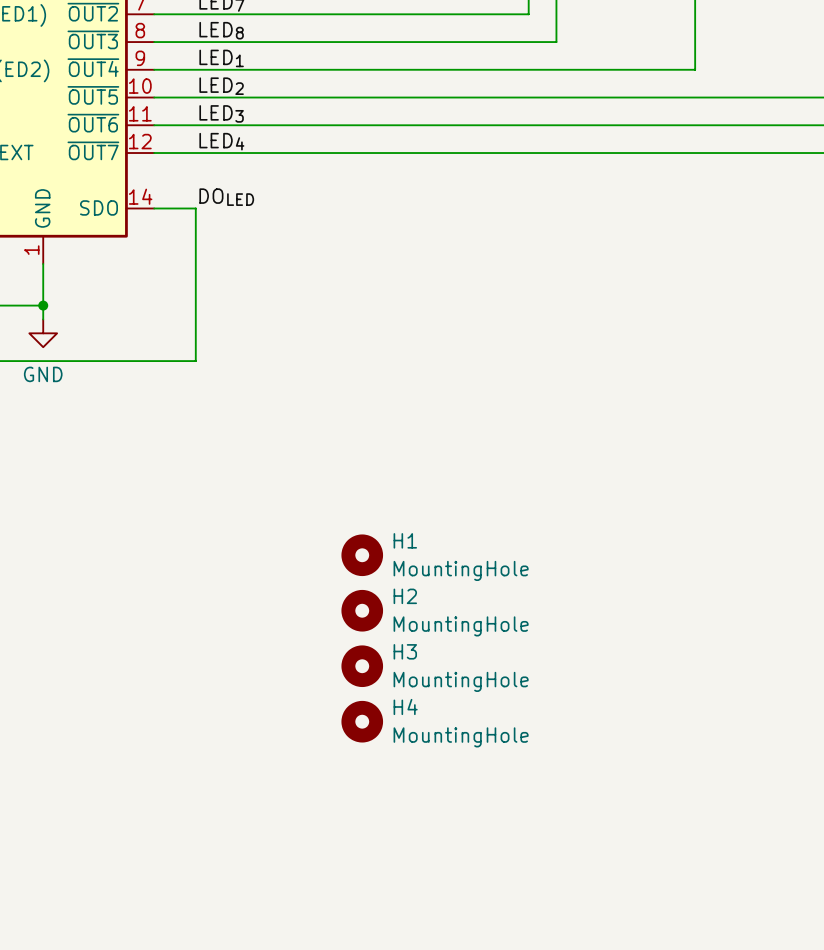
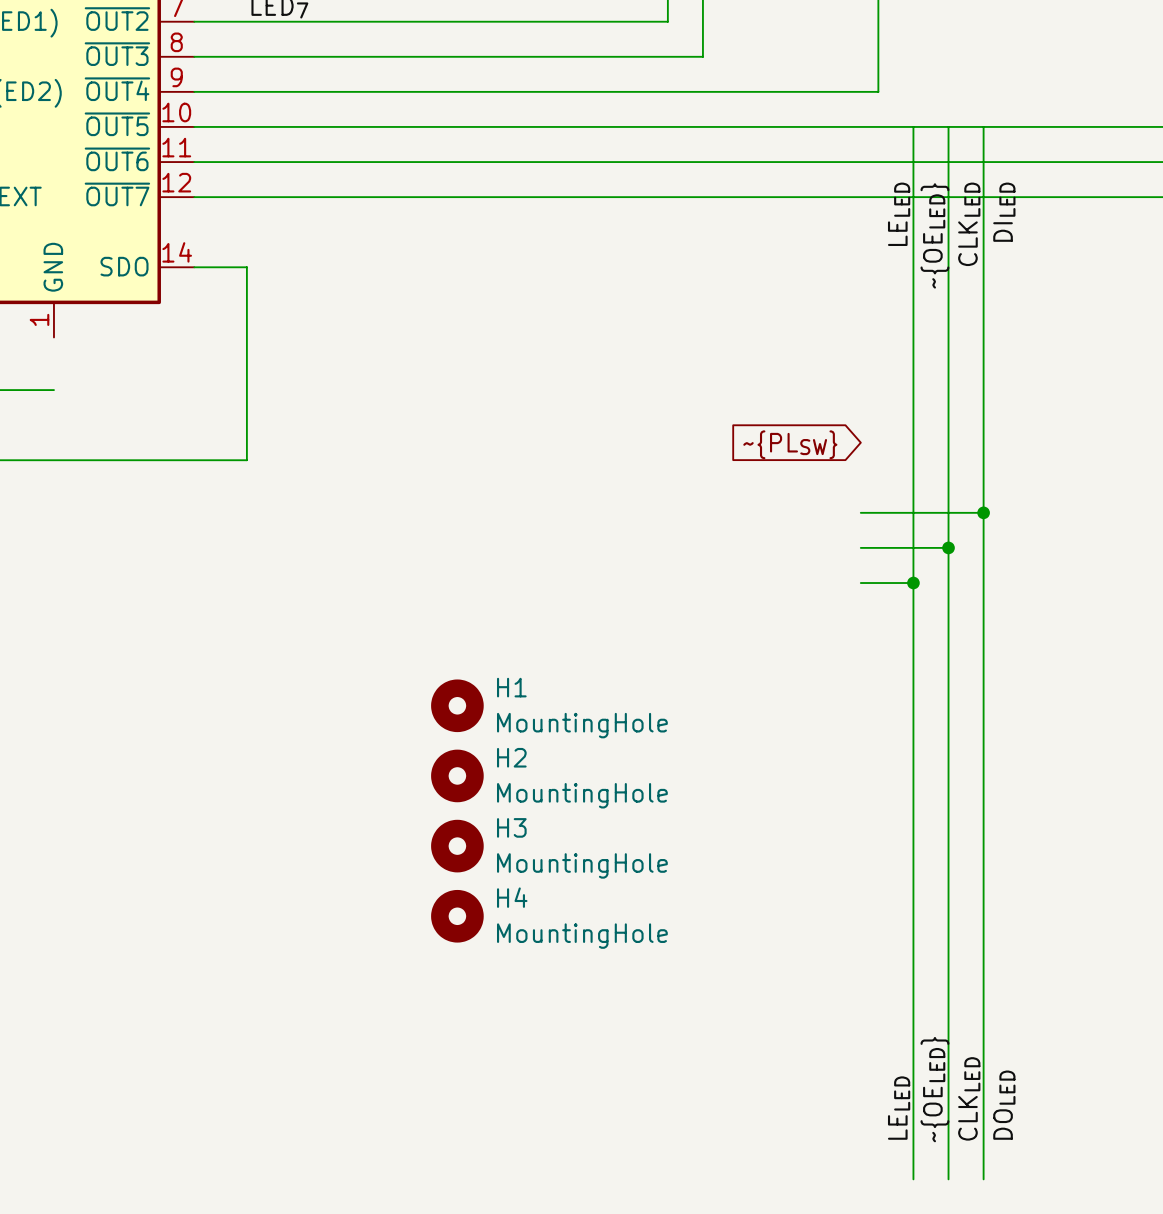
label: LED8 (221, 30) -> none
label: LED1 (221, 58) -> none
label: LED2 (221, 86) -> none
wire: none -> (913, 126) (913, 1179)
wire: none -> (948, 126) (948, 1179)
wire: none -> (983, 126) (983, 1179)
label: LED3 (221, 113) -> none
label: LED4 (221, 141) -> none
label: none -> DILED (1004, 212)
label: none -> LELED (899, 214)
label: none -> CLKLED (969, 224)
label: none -> ~{OELED} (934, 235)
label: DOLED (226, 197) -> none
wire: (43, 263) (43, 319) -> none
junction: (43, 305) -> none
power symbol: GND (43, 333) -> none
global label: none -> ~{PLSW} (790, 444)
wire: none -> (860, 512) (983, 512)
junction: none -> (983, 512)
wire: none -> (860, 547) (948, 547)
junction: none -> (948, 547)
wire: none -> (860, 583) (913, 583)
junction: none -> (913, 583)
label: none -> ~{OELED} (934, 1089)
label: none -> CLKLED (969, 1098)
label: none -> DOLED (1004, 1105)
label: none -> LELED (899, 1108)

